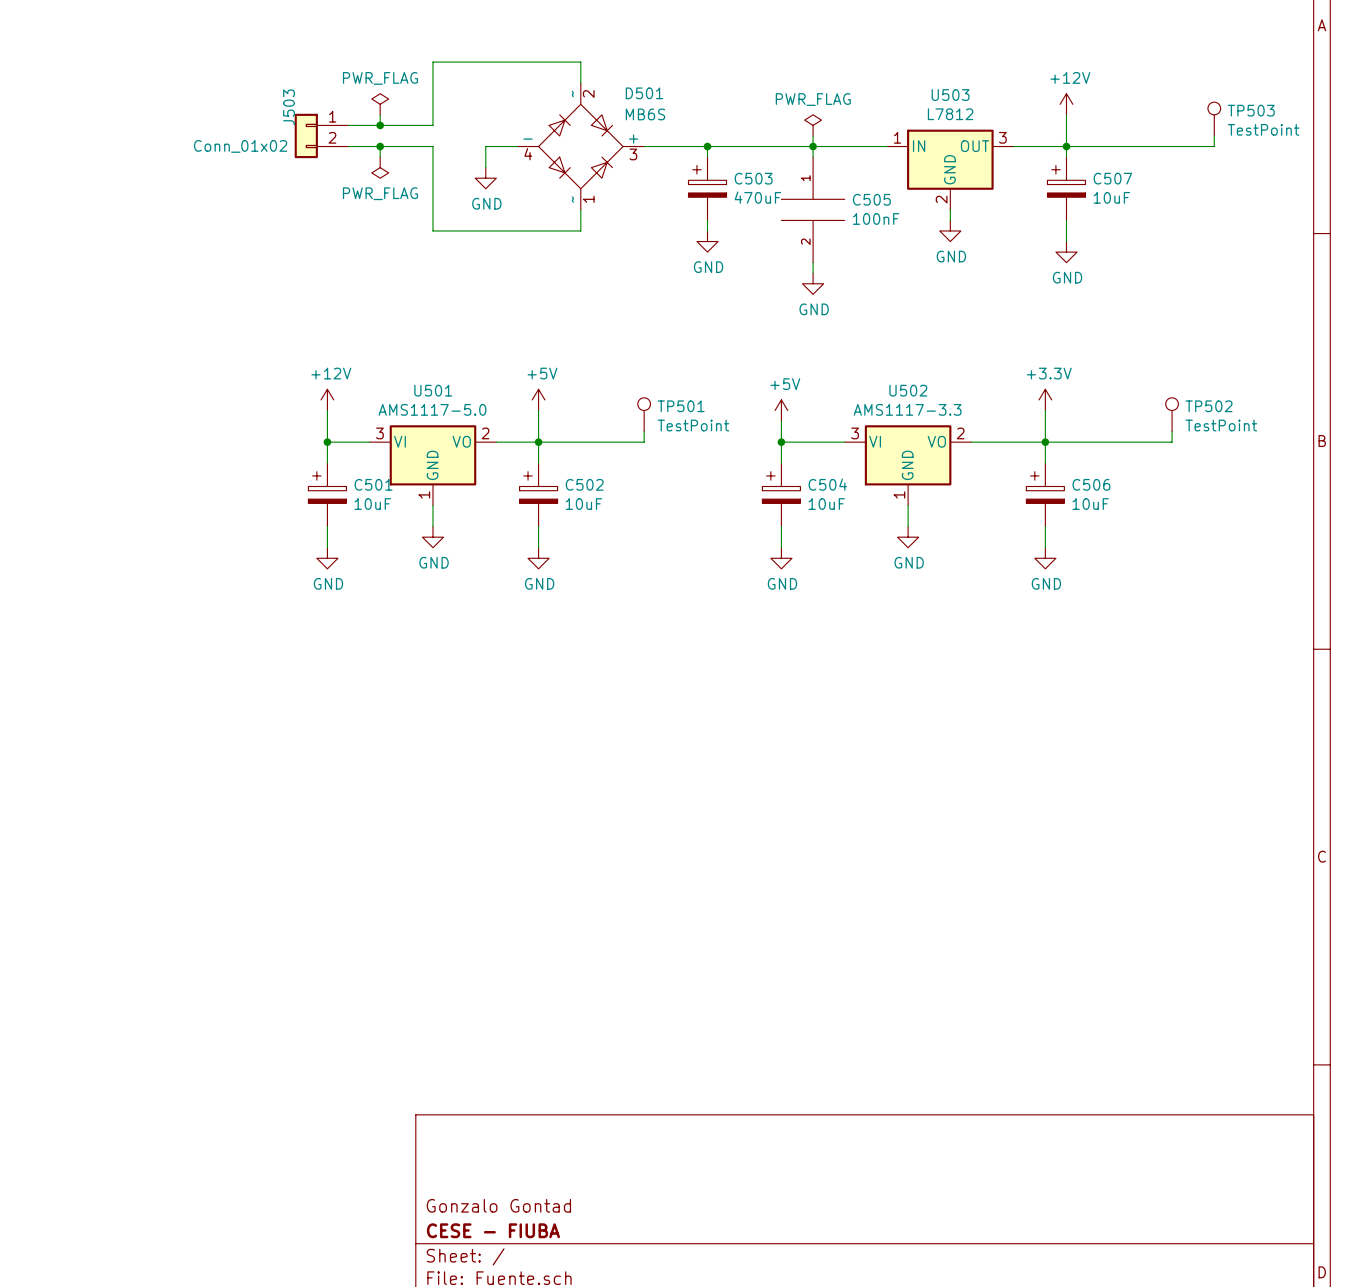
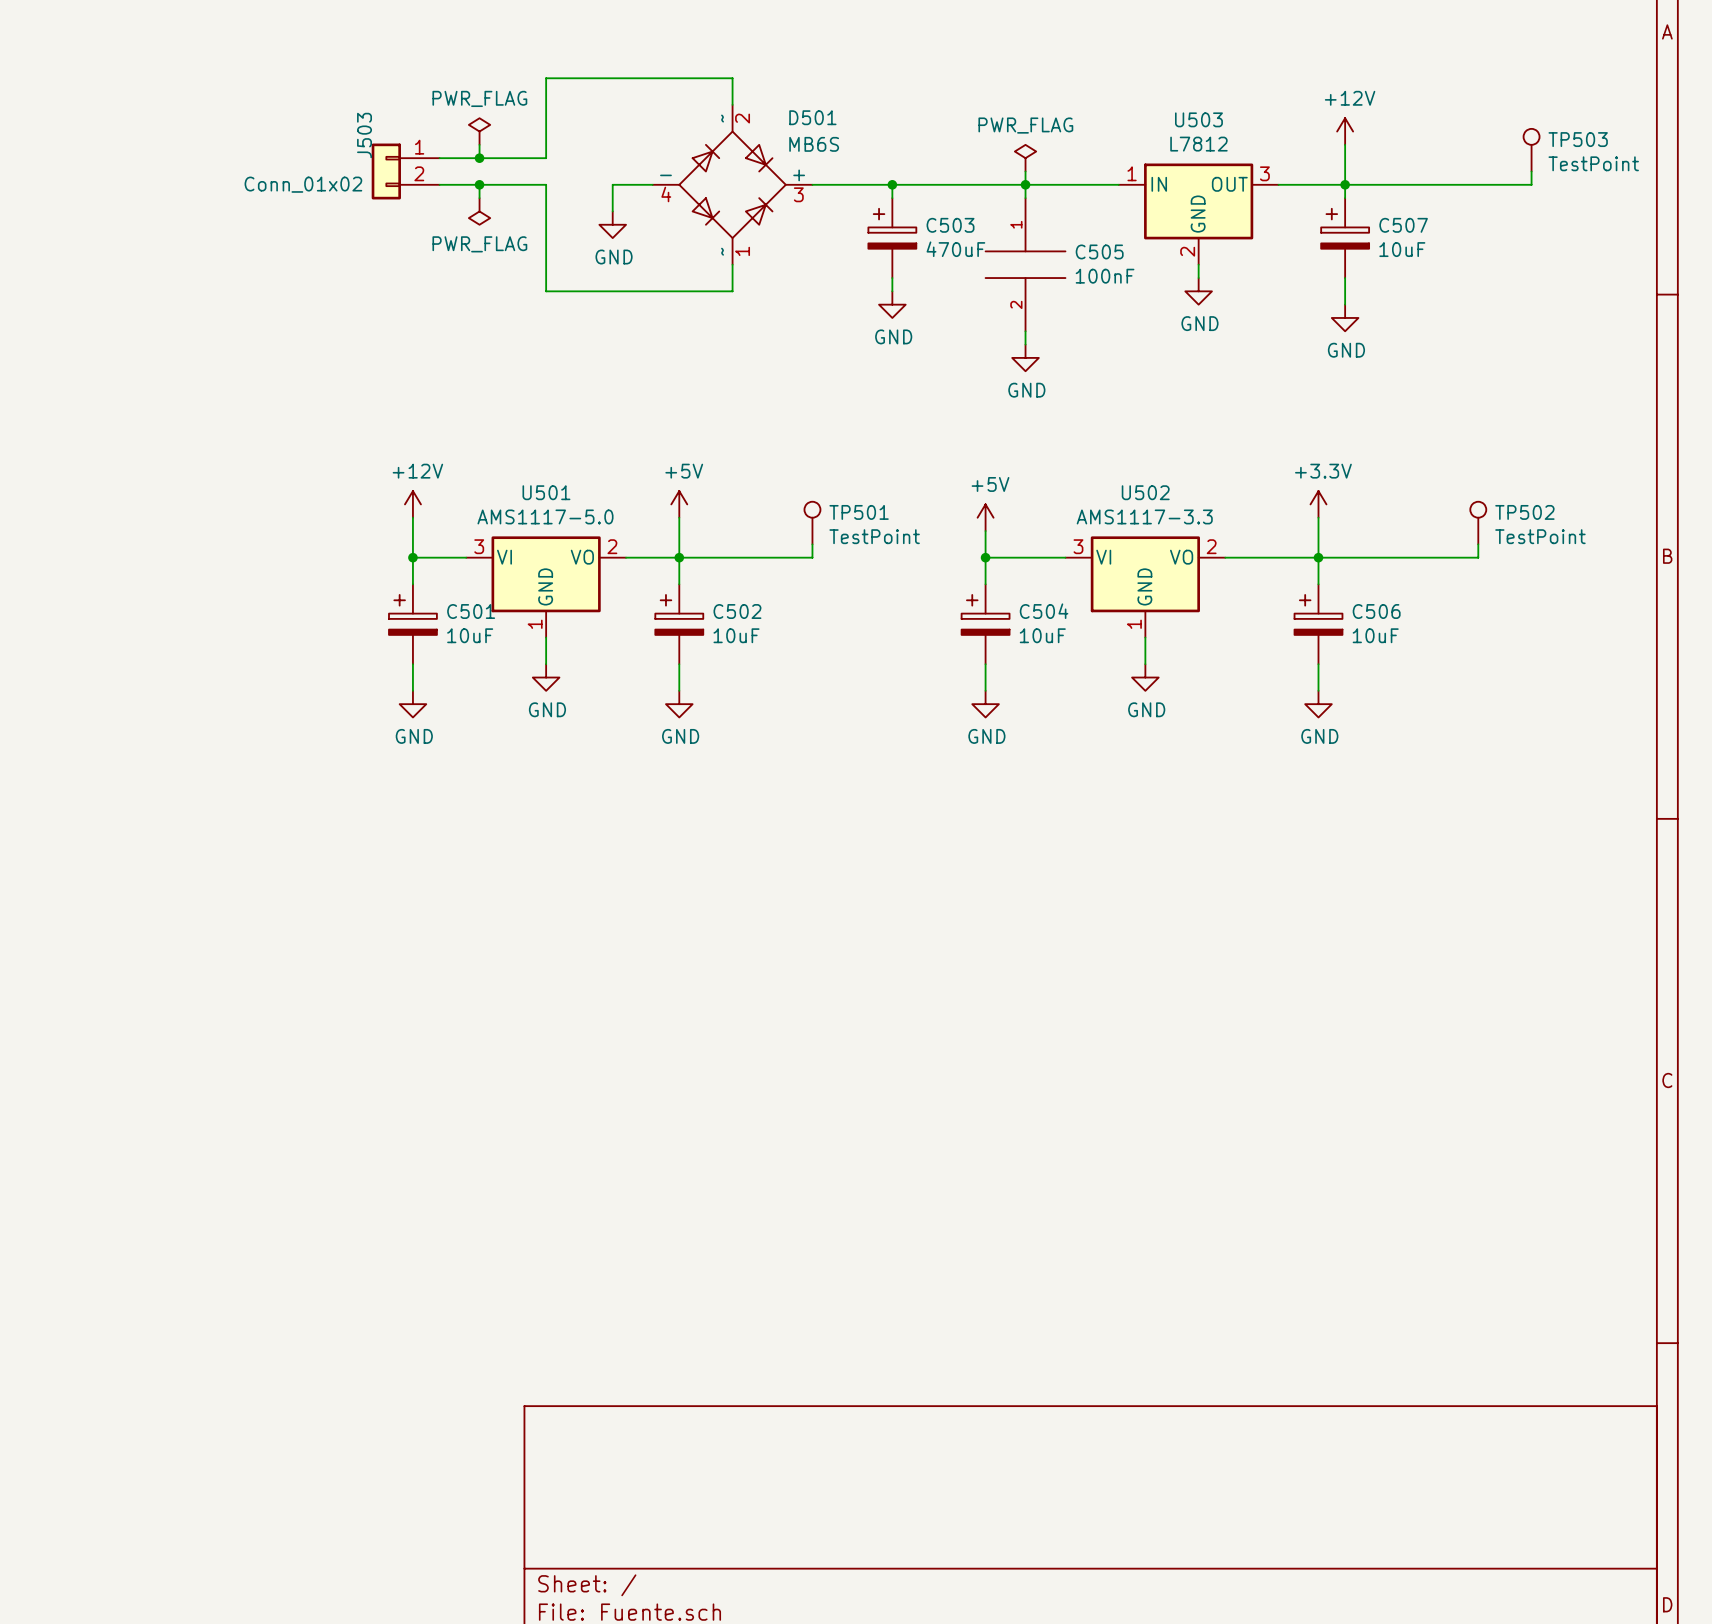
title block: Gonzalo Gontad (498, 1205) -> none
title block: CESE - FIUBA (493, 1230) -> none

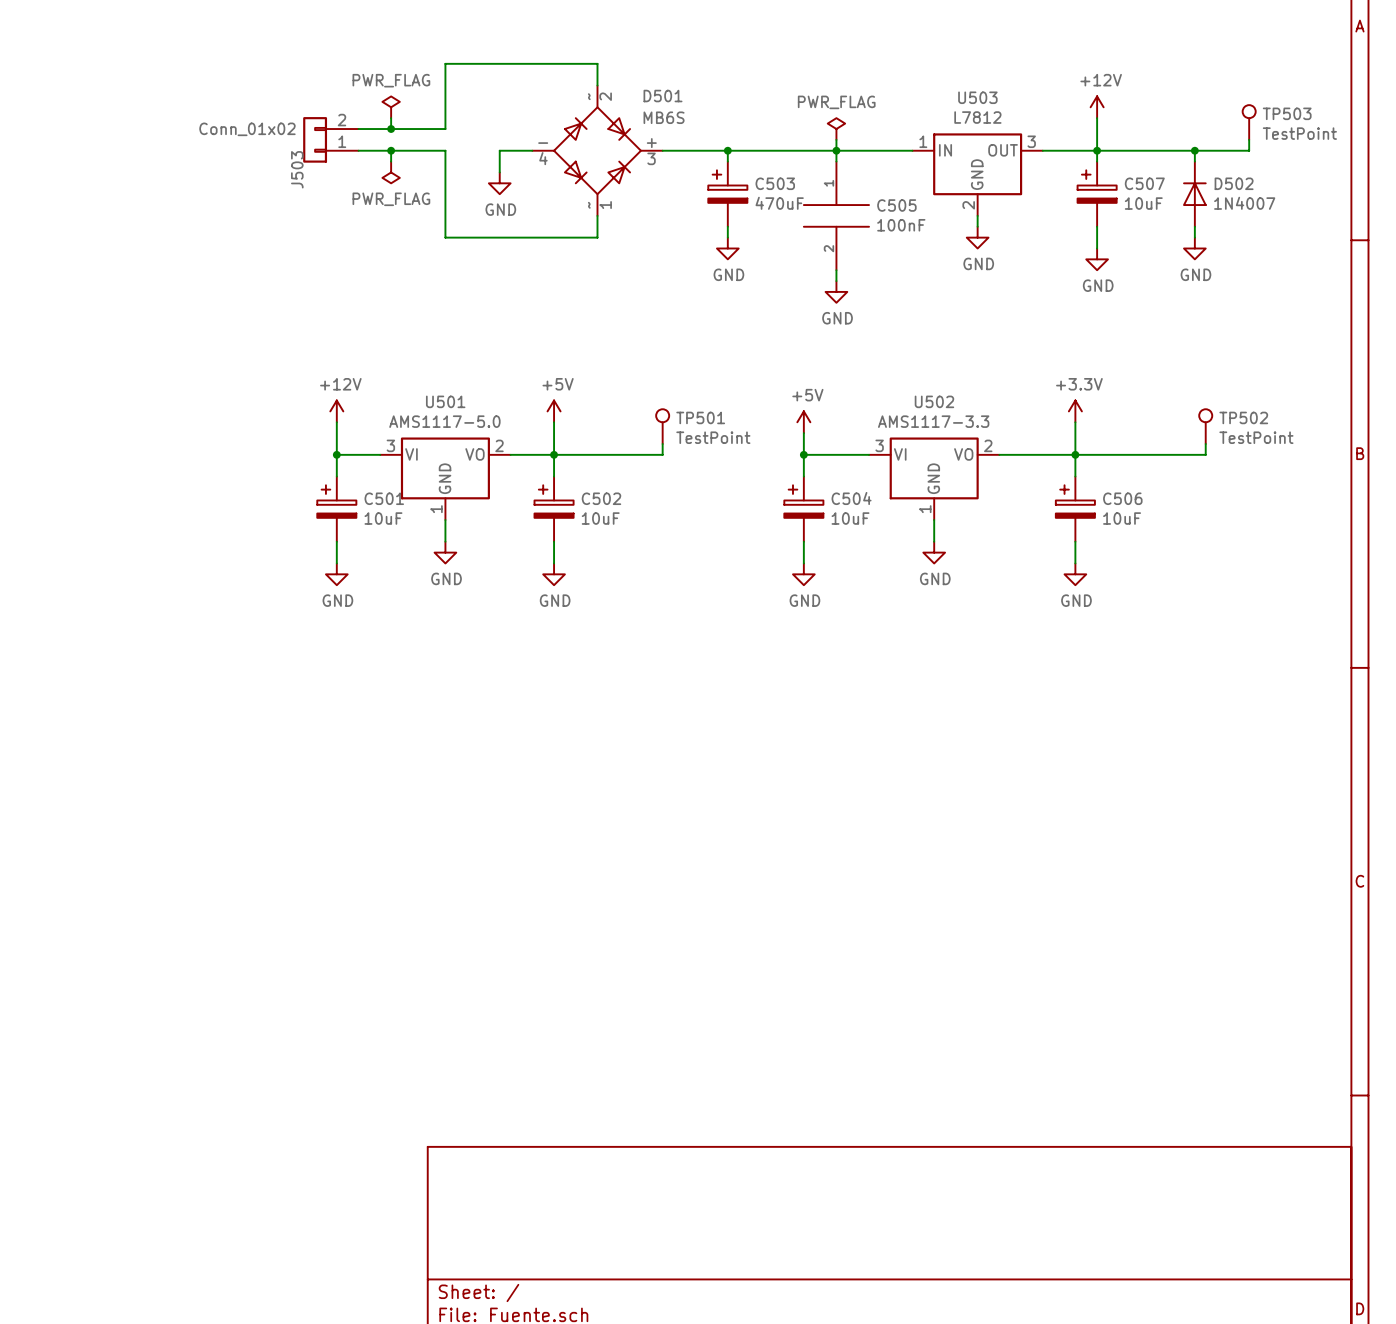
J503 flip: as is (386, 171) -> up-down (315, 139)
wire: none -> (1194, 150) (1194, 161)
junction: none -> (1194, 150)
D502: none -> 1N4007 (1194, 194)
wire: none -> (1194, 226) (1194, 237)
power symbol: none -> GND (1194, 248)

